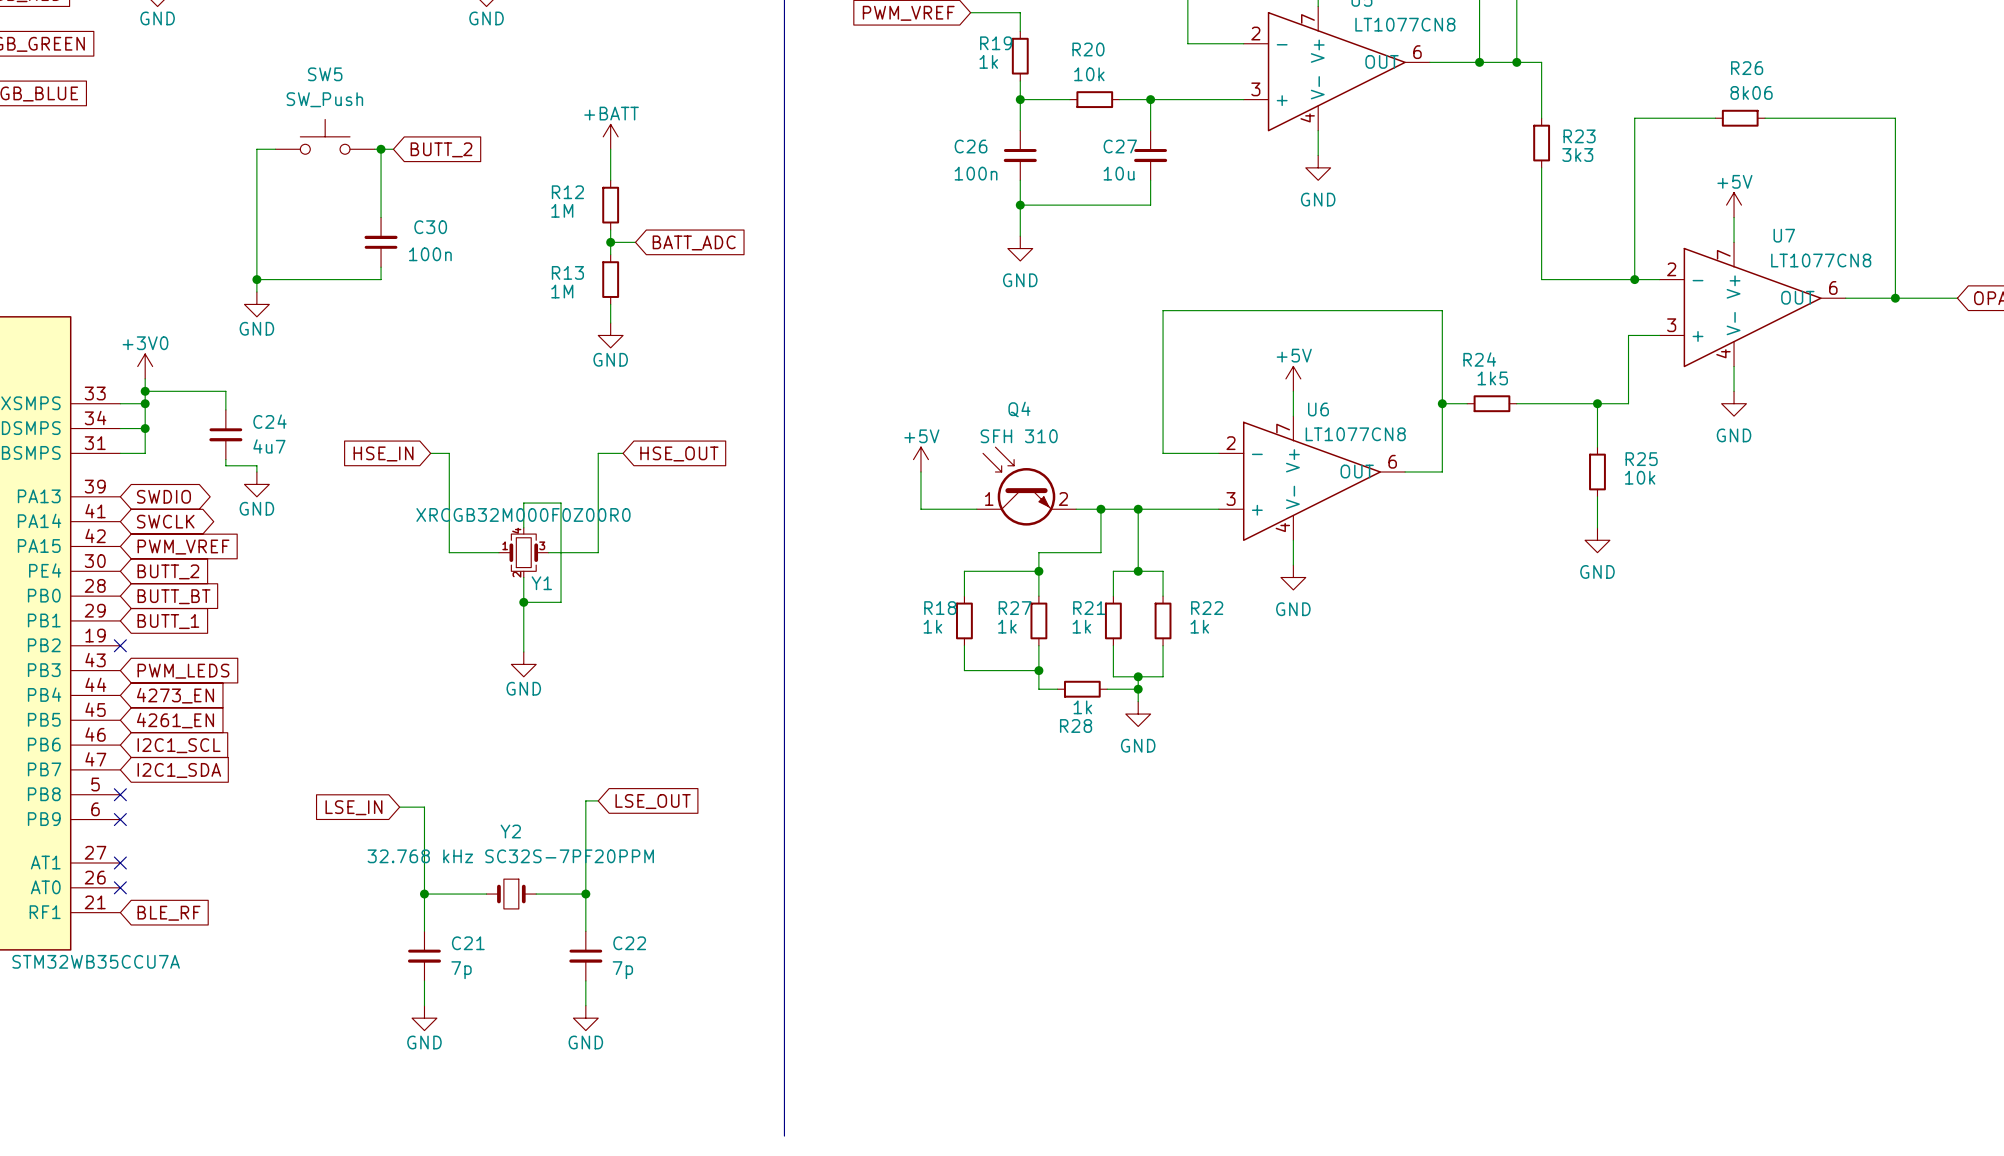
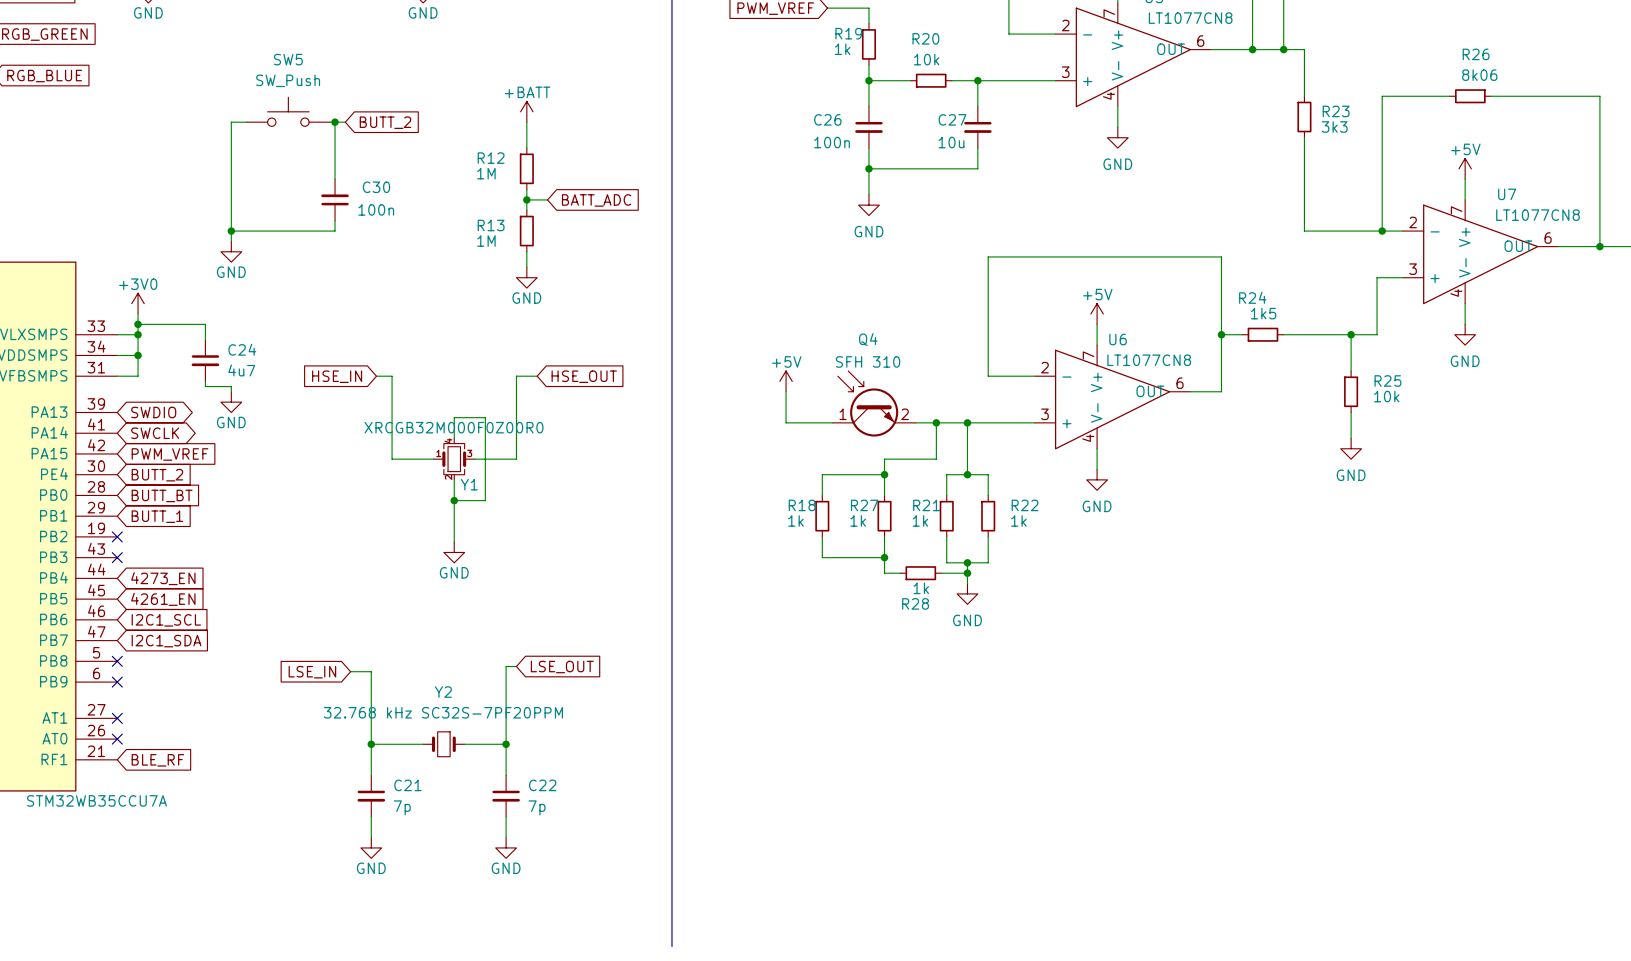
no-connect mark: none -> (117, 557)
global label: PWM_LEDS (183, 671) -> none

